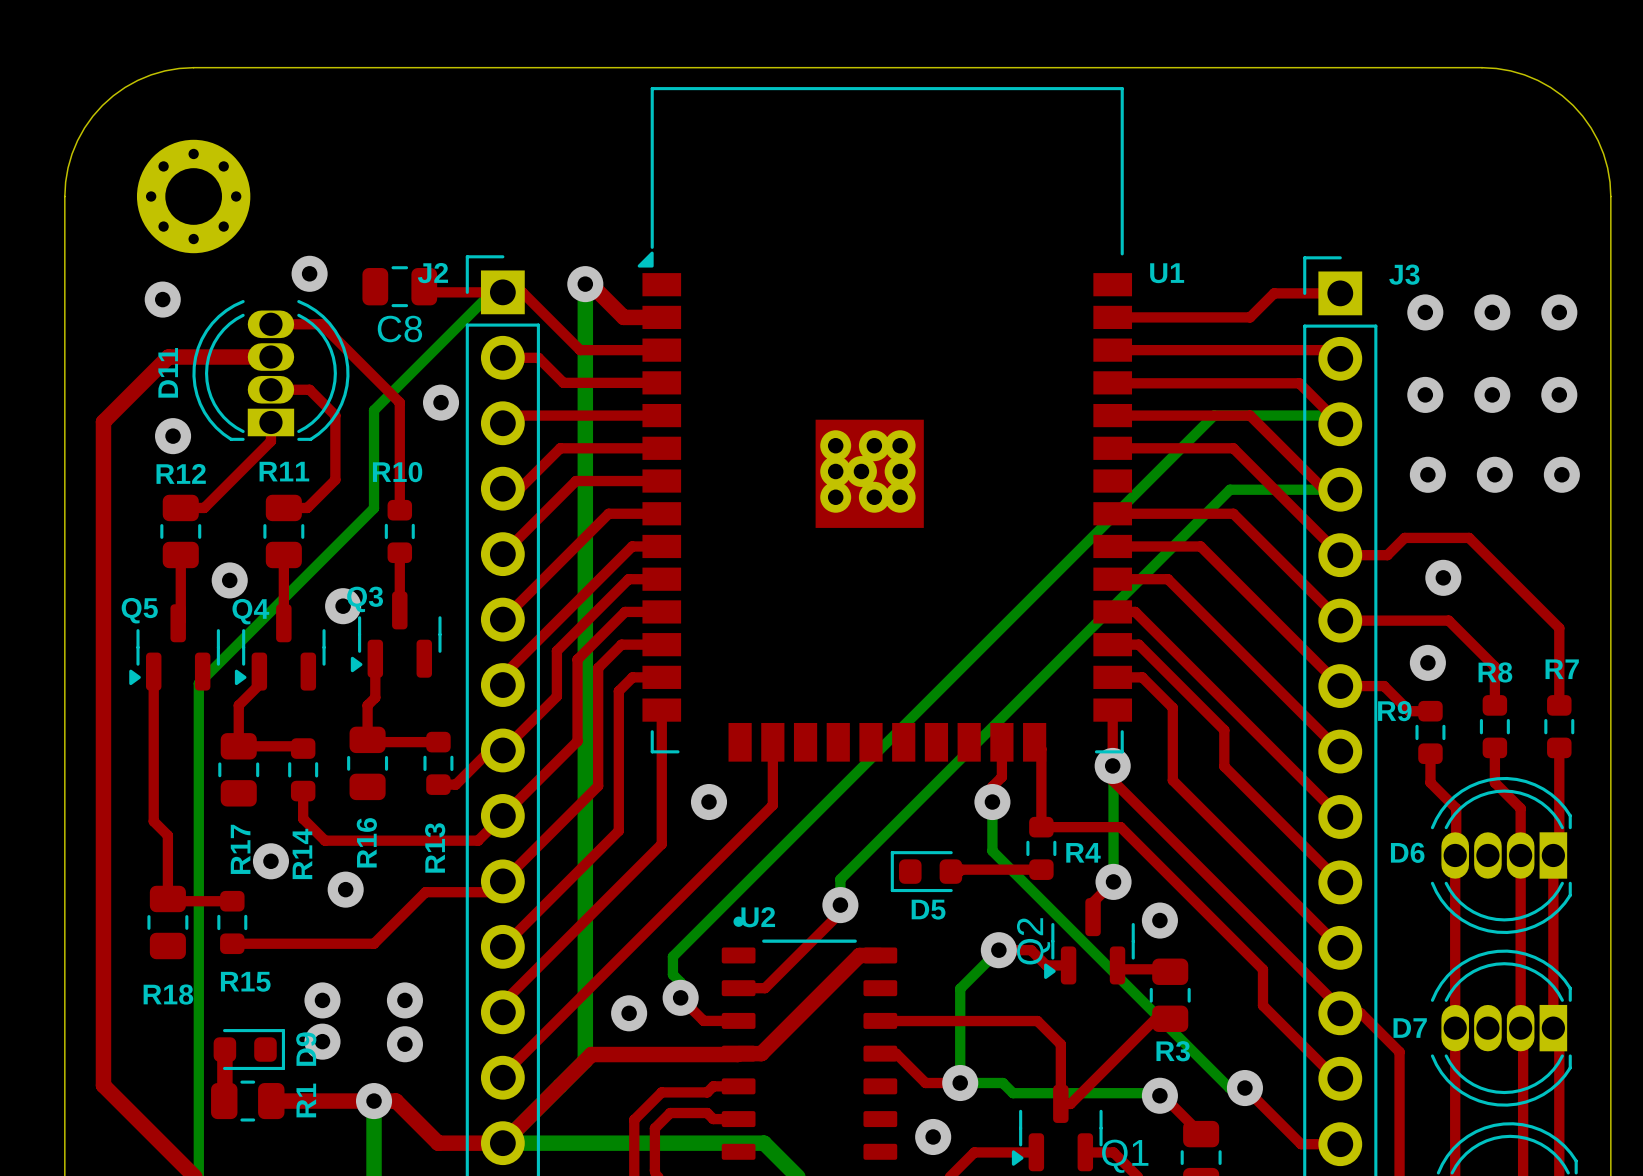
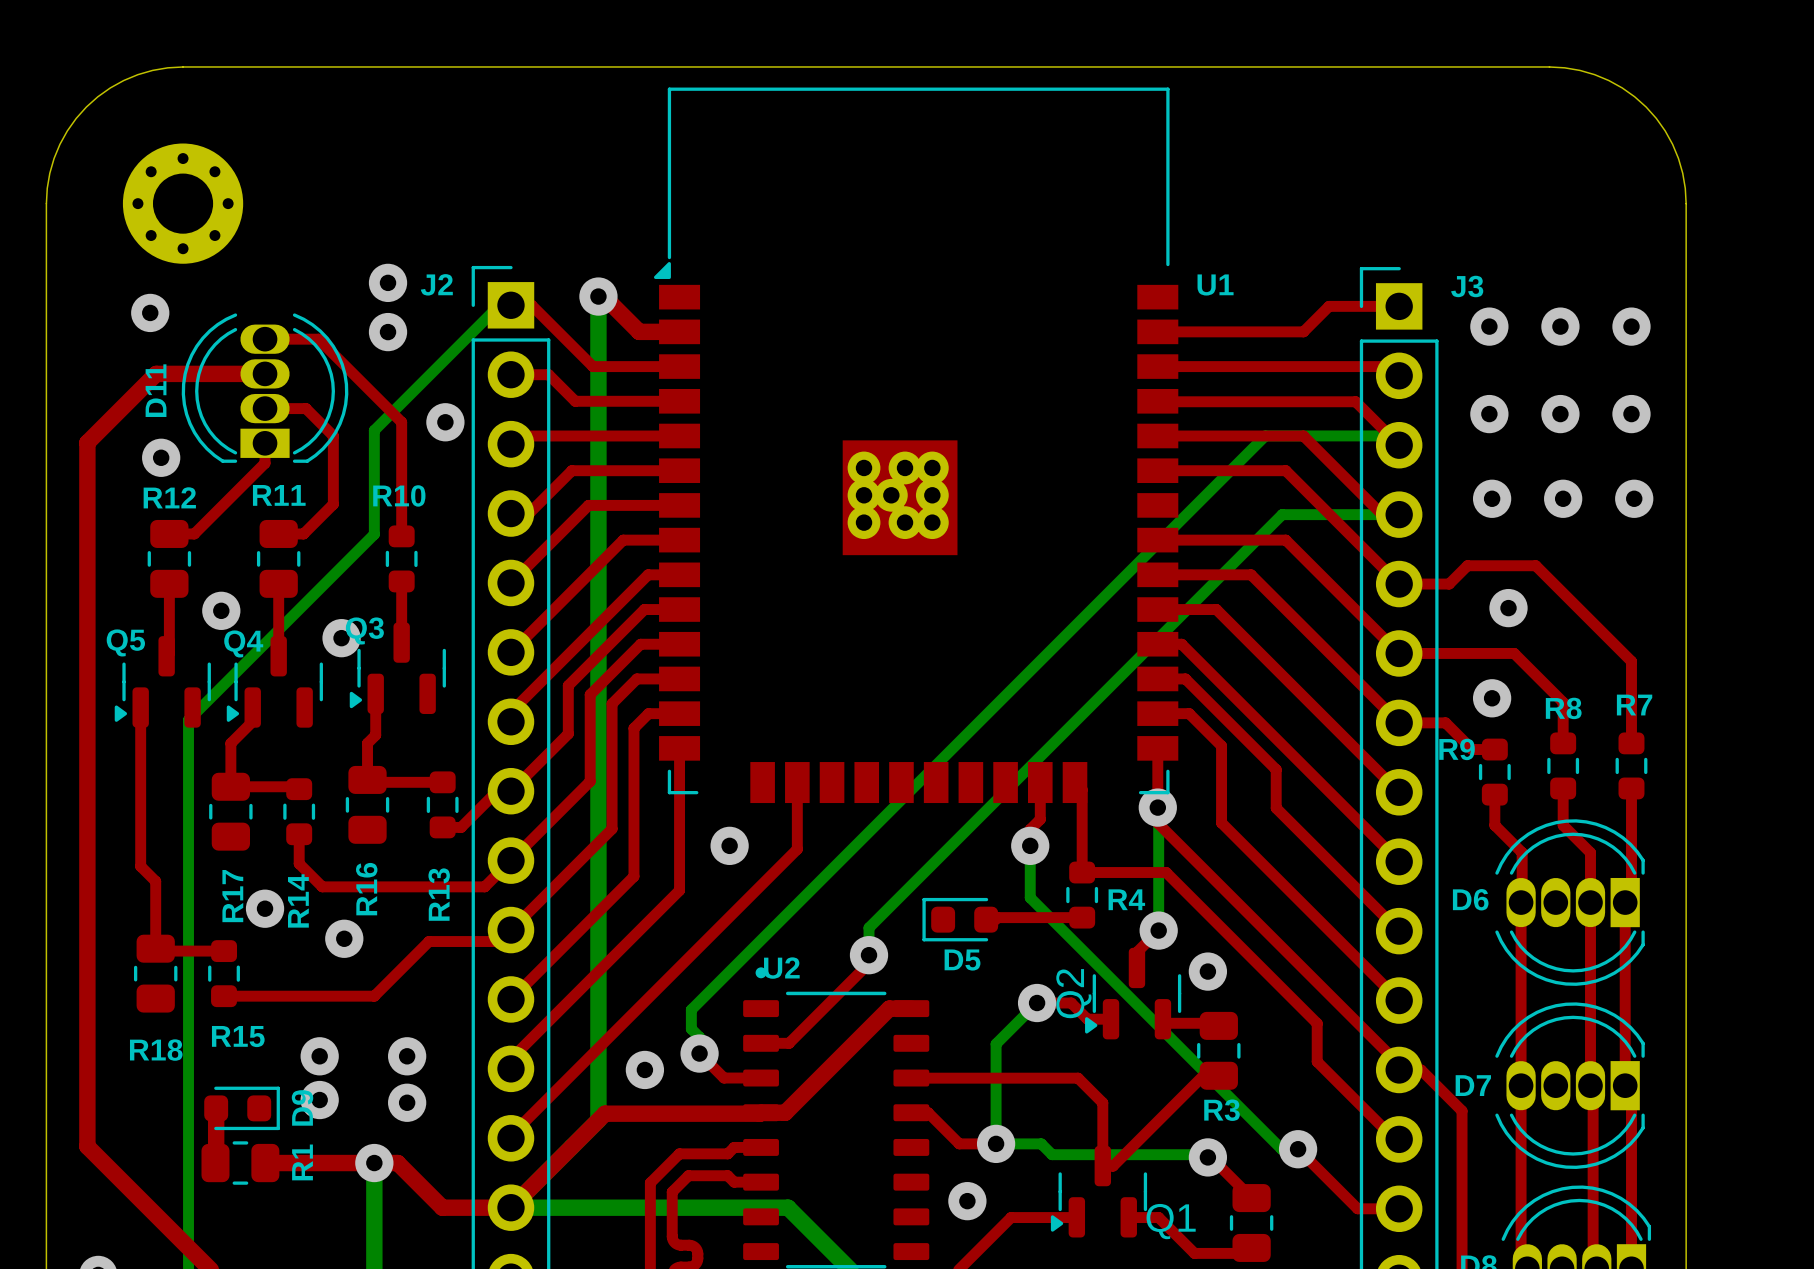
via: none -> (388, 282)
via: (309, 273) -> none
C8: (399, 286) -> none
top track: (424, 286) (429, 292) (502, 292) -> none
via: none -> (388, 332)

